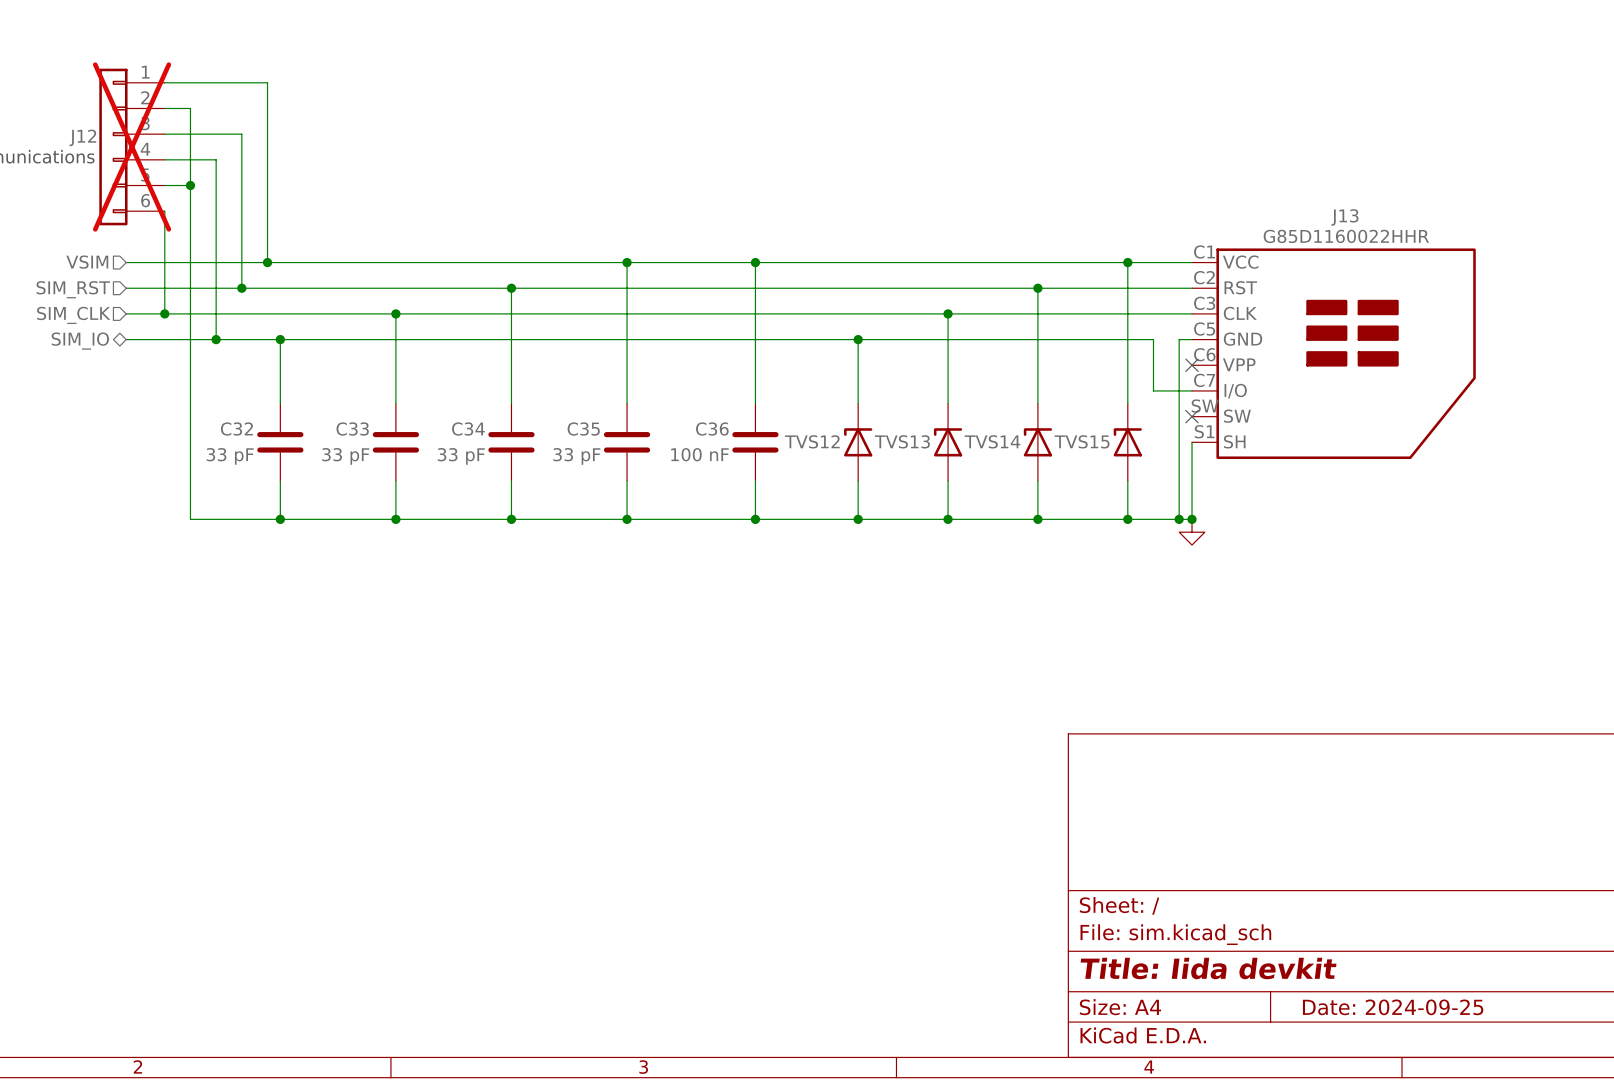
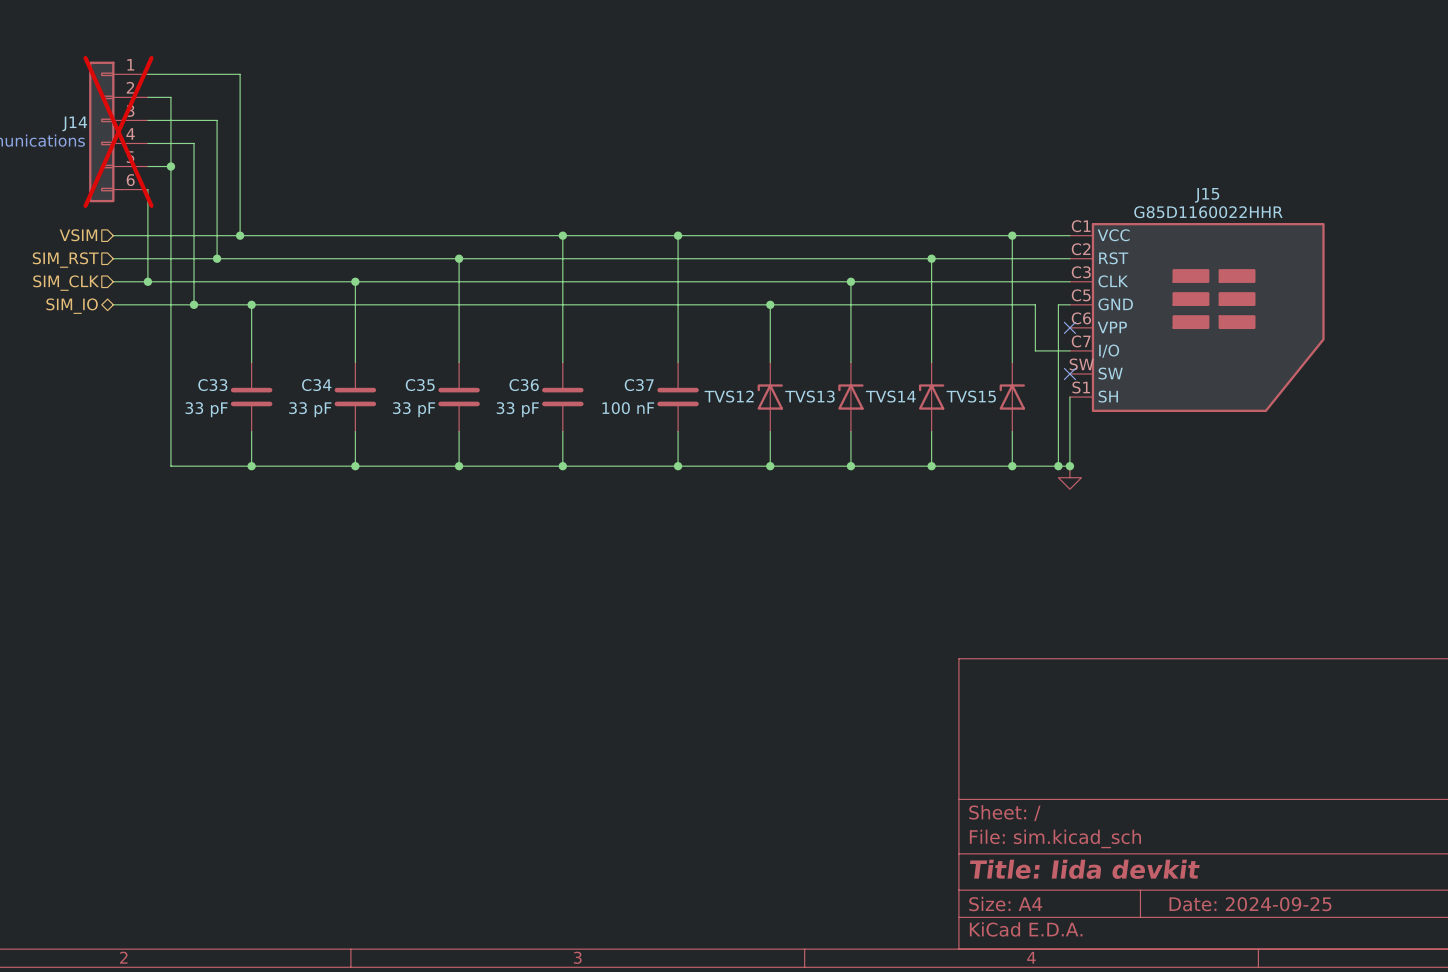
J12 name: J12 (82, 137) -> J14 (74, 123)
J13 name: J13 (1344, 217) -> J15 (1207, 195)
C32 name: C32 (236, 429) -> C33 (212, 385)
C33 name: C33 (352, 429) -> C34 (316, 385)
C34 name: C34 (468, 429) -> C35 (420, 385)
C35 name: C35 (583, 429) -> C36 (524, 385)
C36 name: C36 (712, 429) -> C37 (639, 385)

